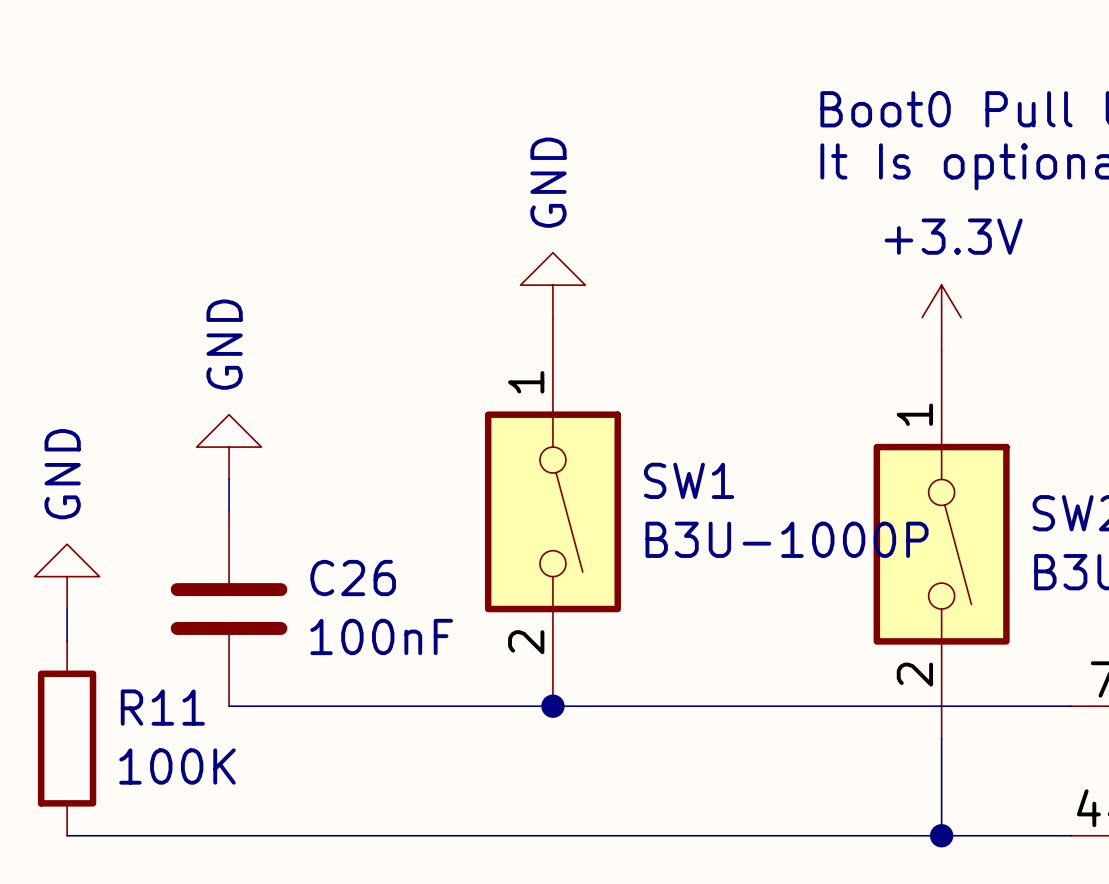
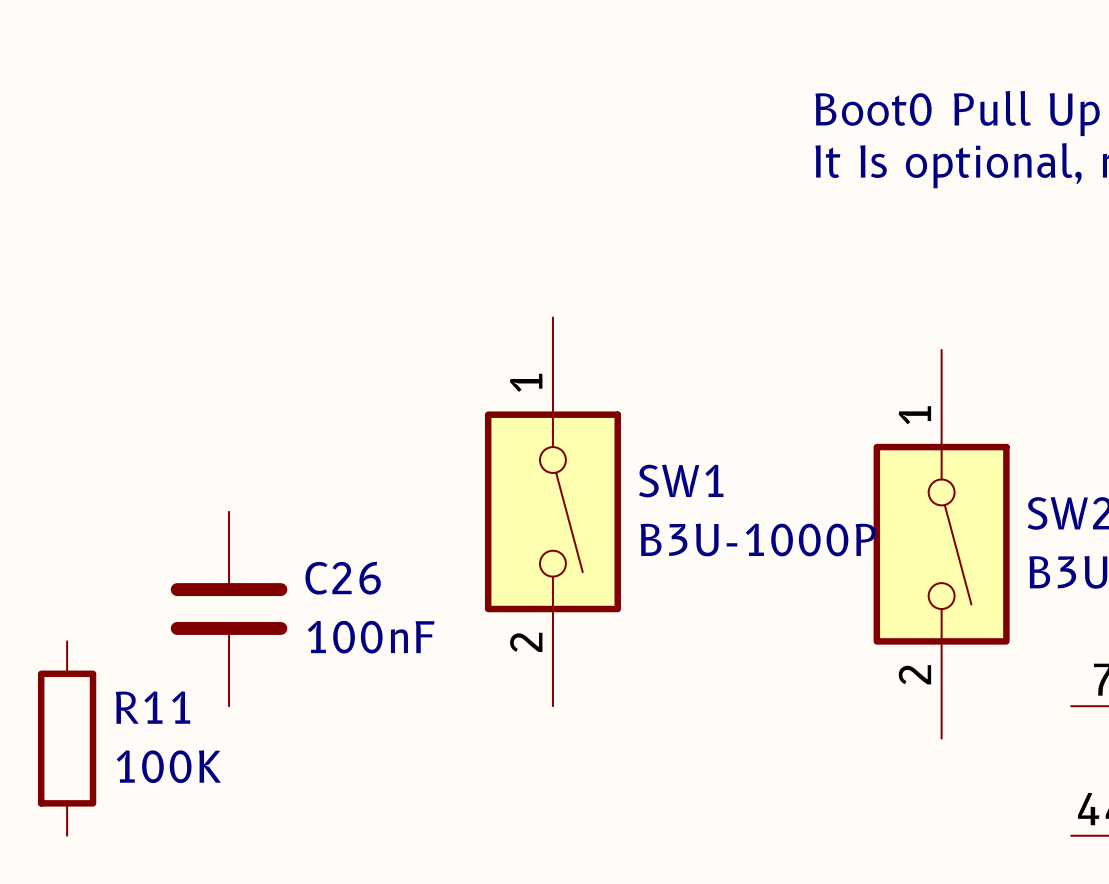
power symbol: GND (552, 285) -> none
power symbol: +3.3V (941, 317) -> none
power symbol: GND (229, 447) -> none
wire: (229, 479) (229, 511) -> none
power symbol: GND (67, 576) -> none
wire: (67, 609) (67, 641) -> none
wire: (229, 706) (1071, 706) -> none
junction: (552, 706) -> none
wire: (941, 738) (941, 835) -> none
wire: (67, 835) (1071, 835) -> none
junction: (941, 835) -> none

